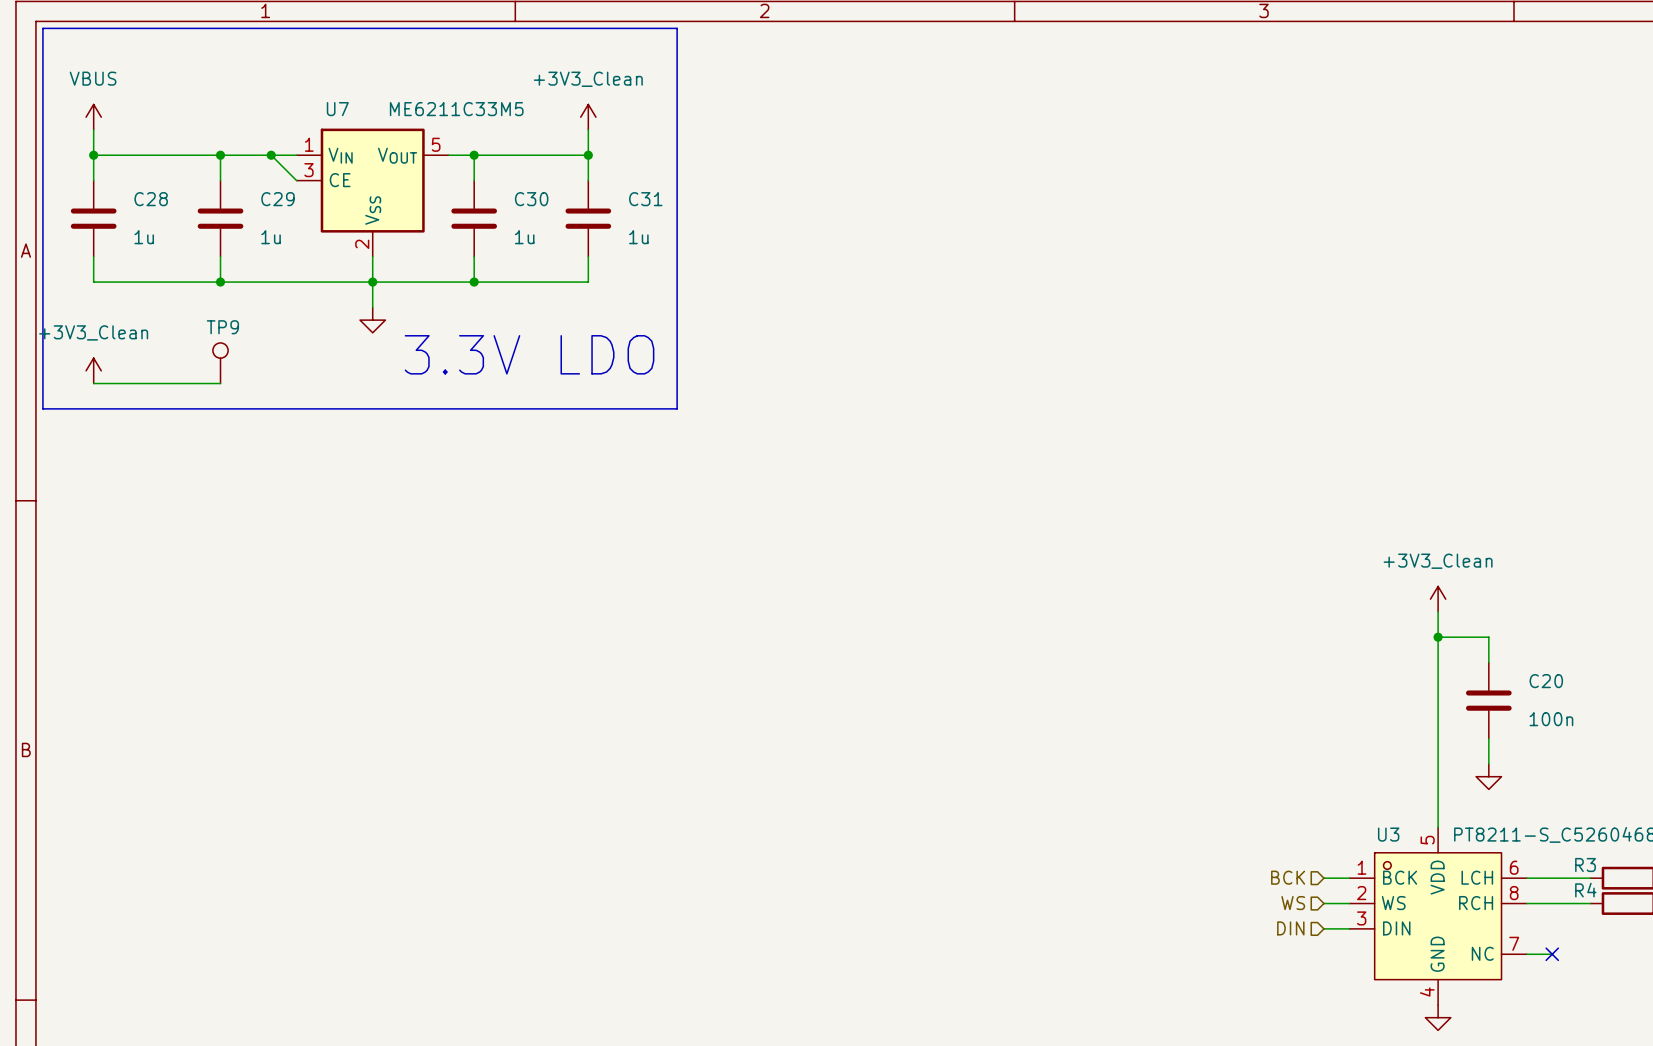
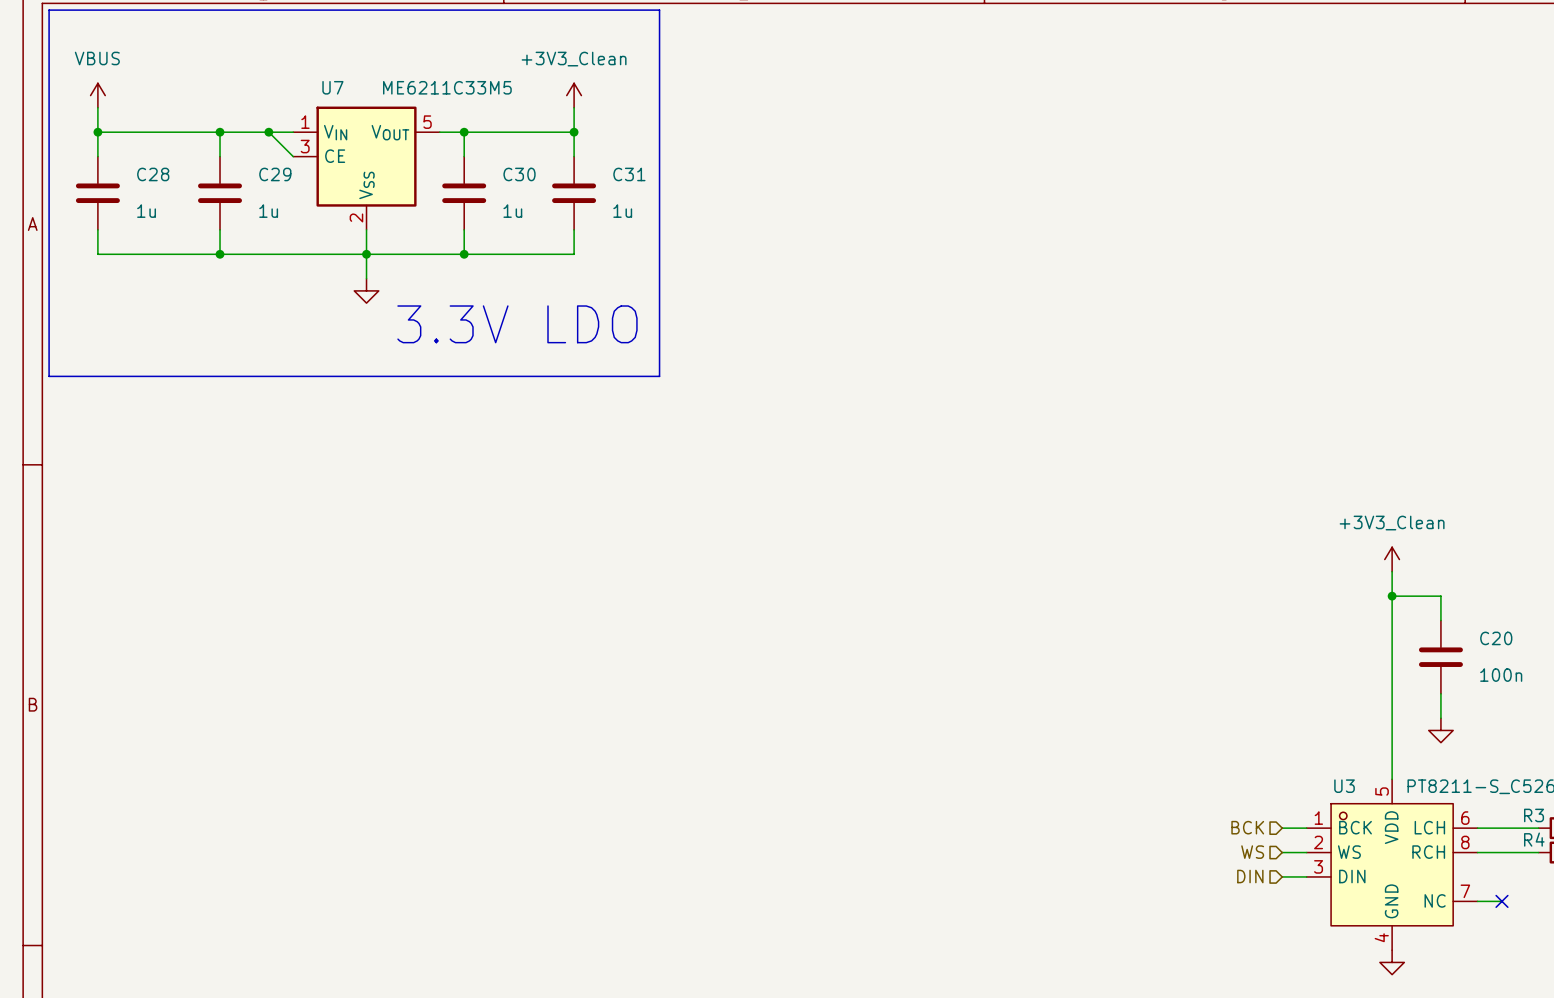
TP9: (220, 363) -> none
power symbol: +3V3_Clean (93, 370) -> none
wire: (93, 383) (220, 383) -> none

